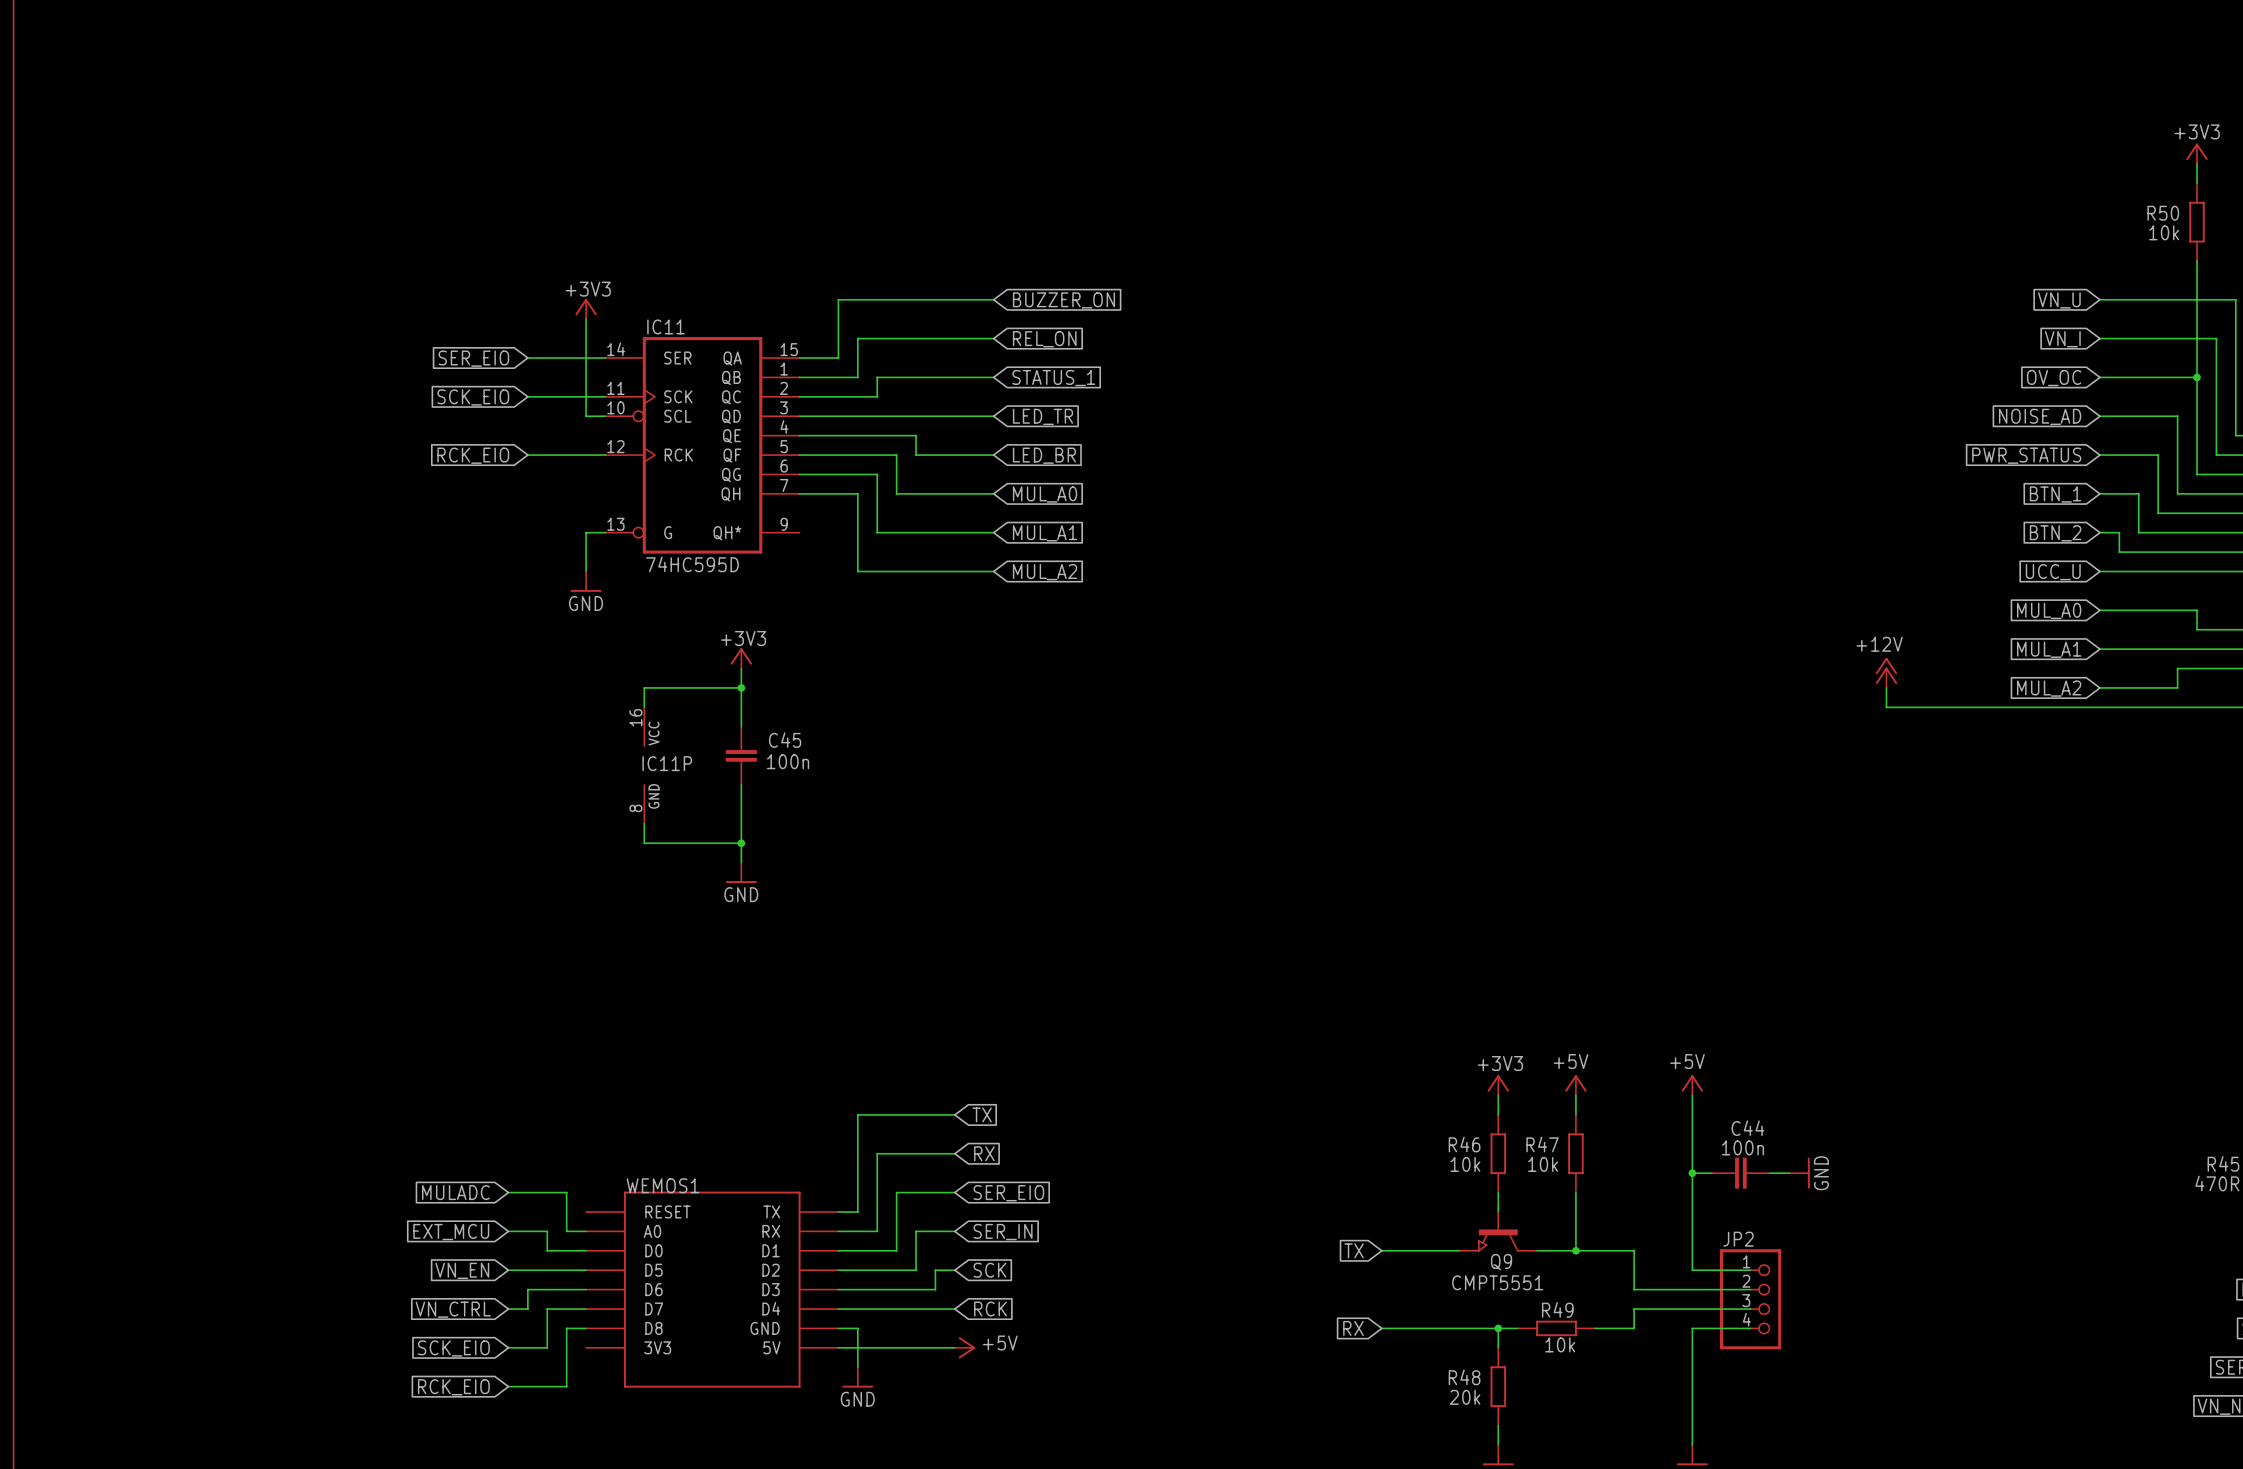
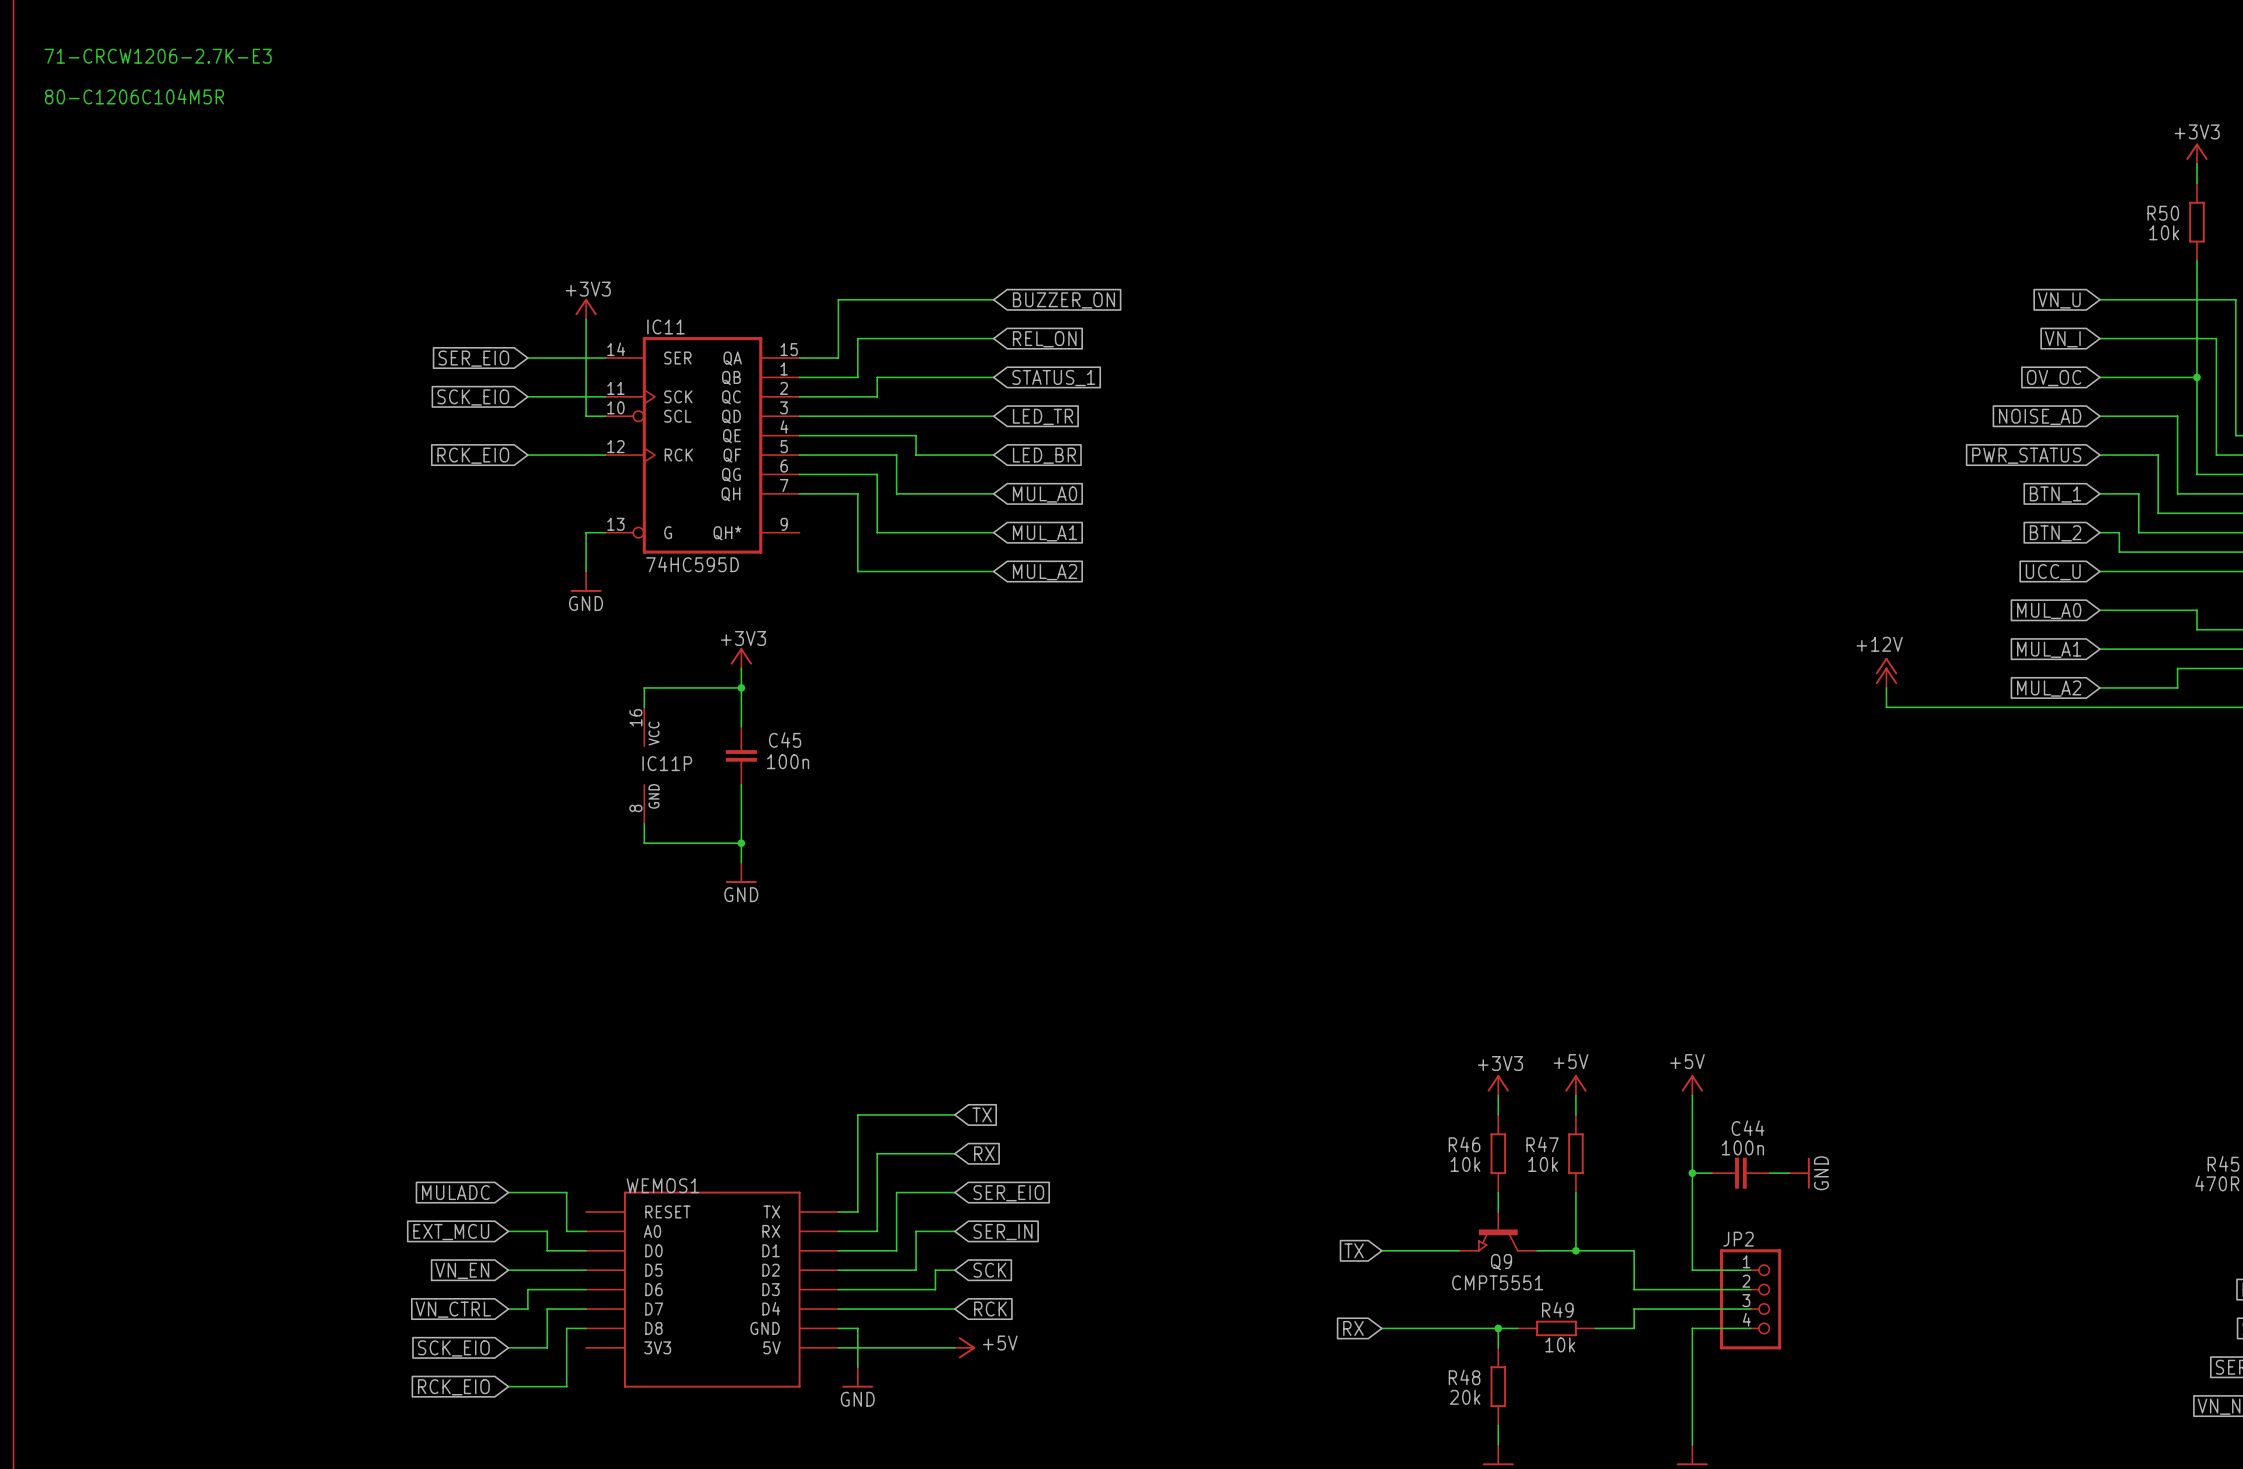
text: none -> 71-CRCW1206-2.7K-E3 (158, 56)
text: none -> 80-C1206C104M5R (134, 96)

